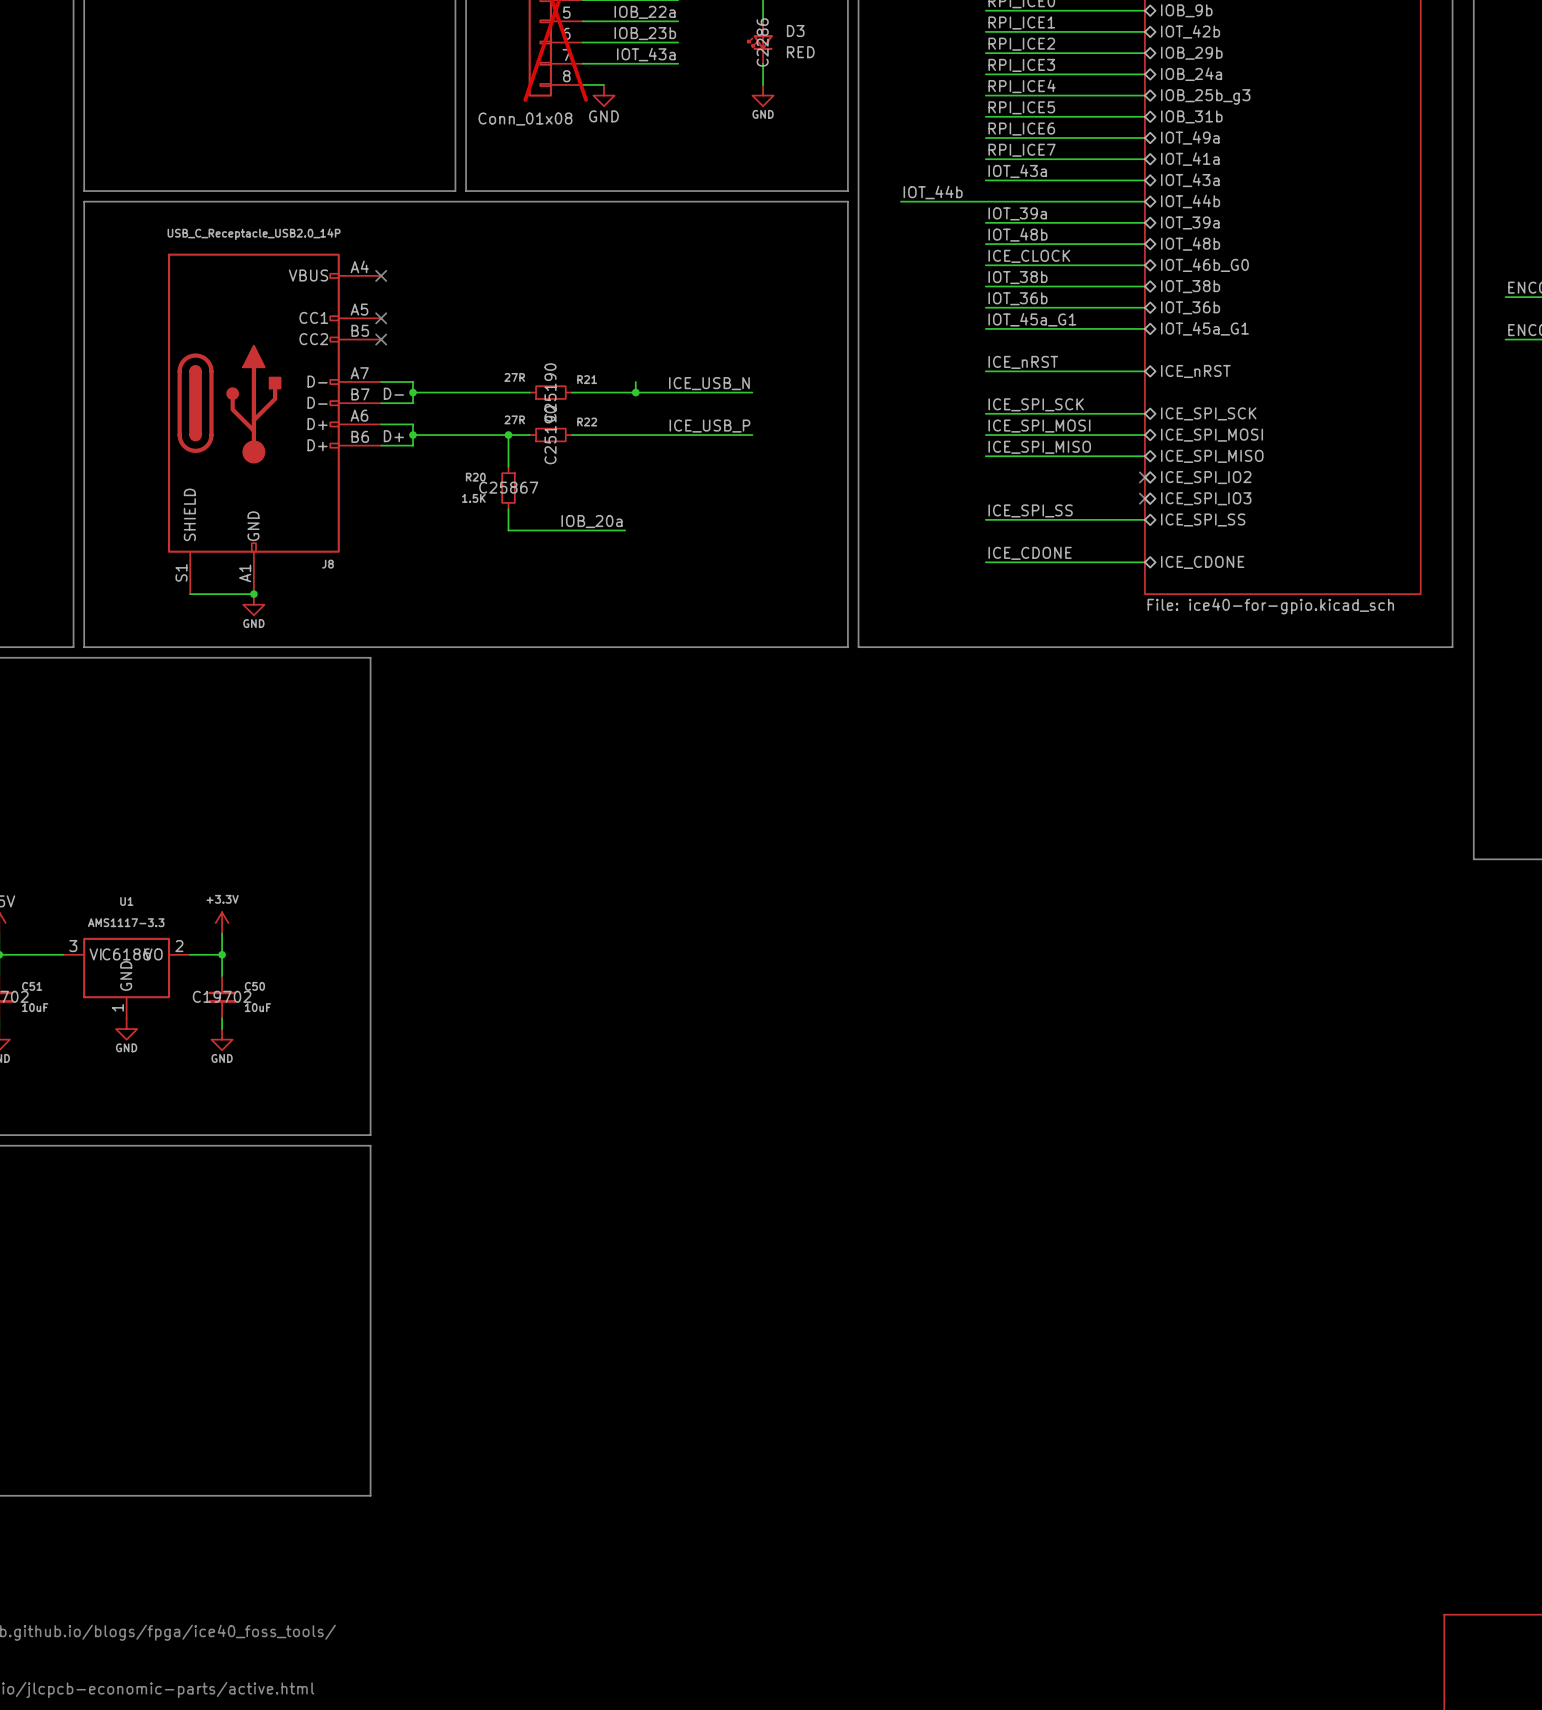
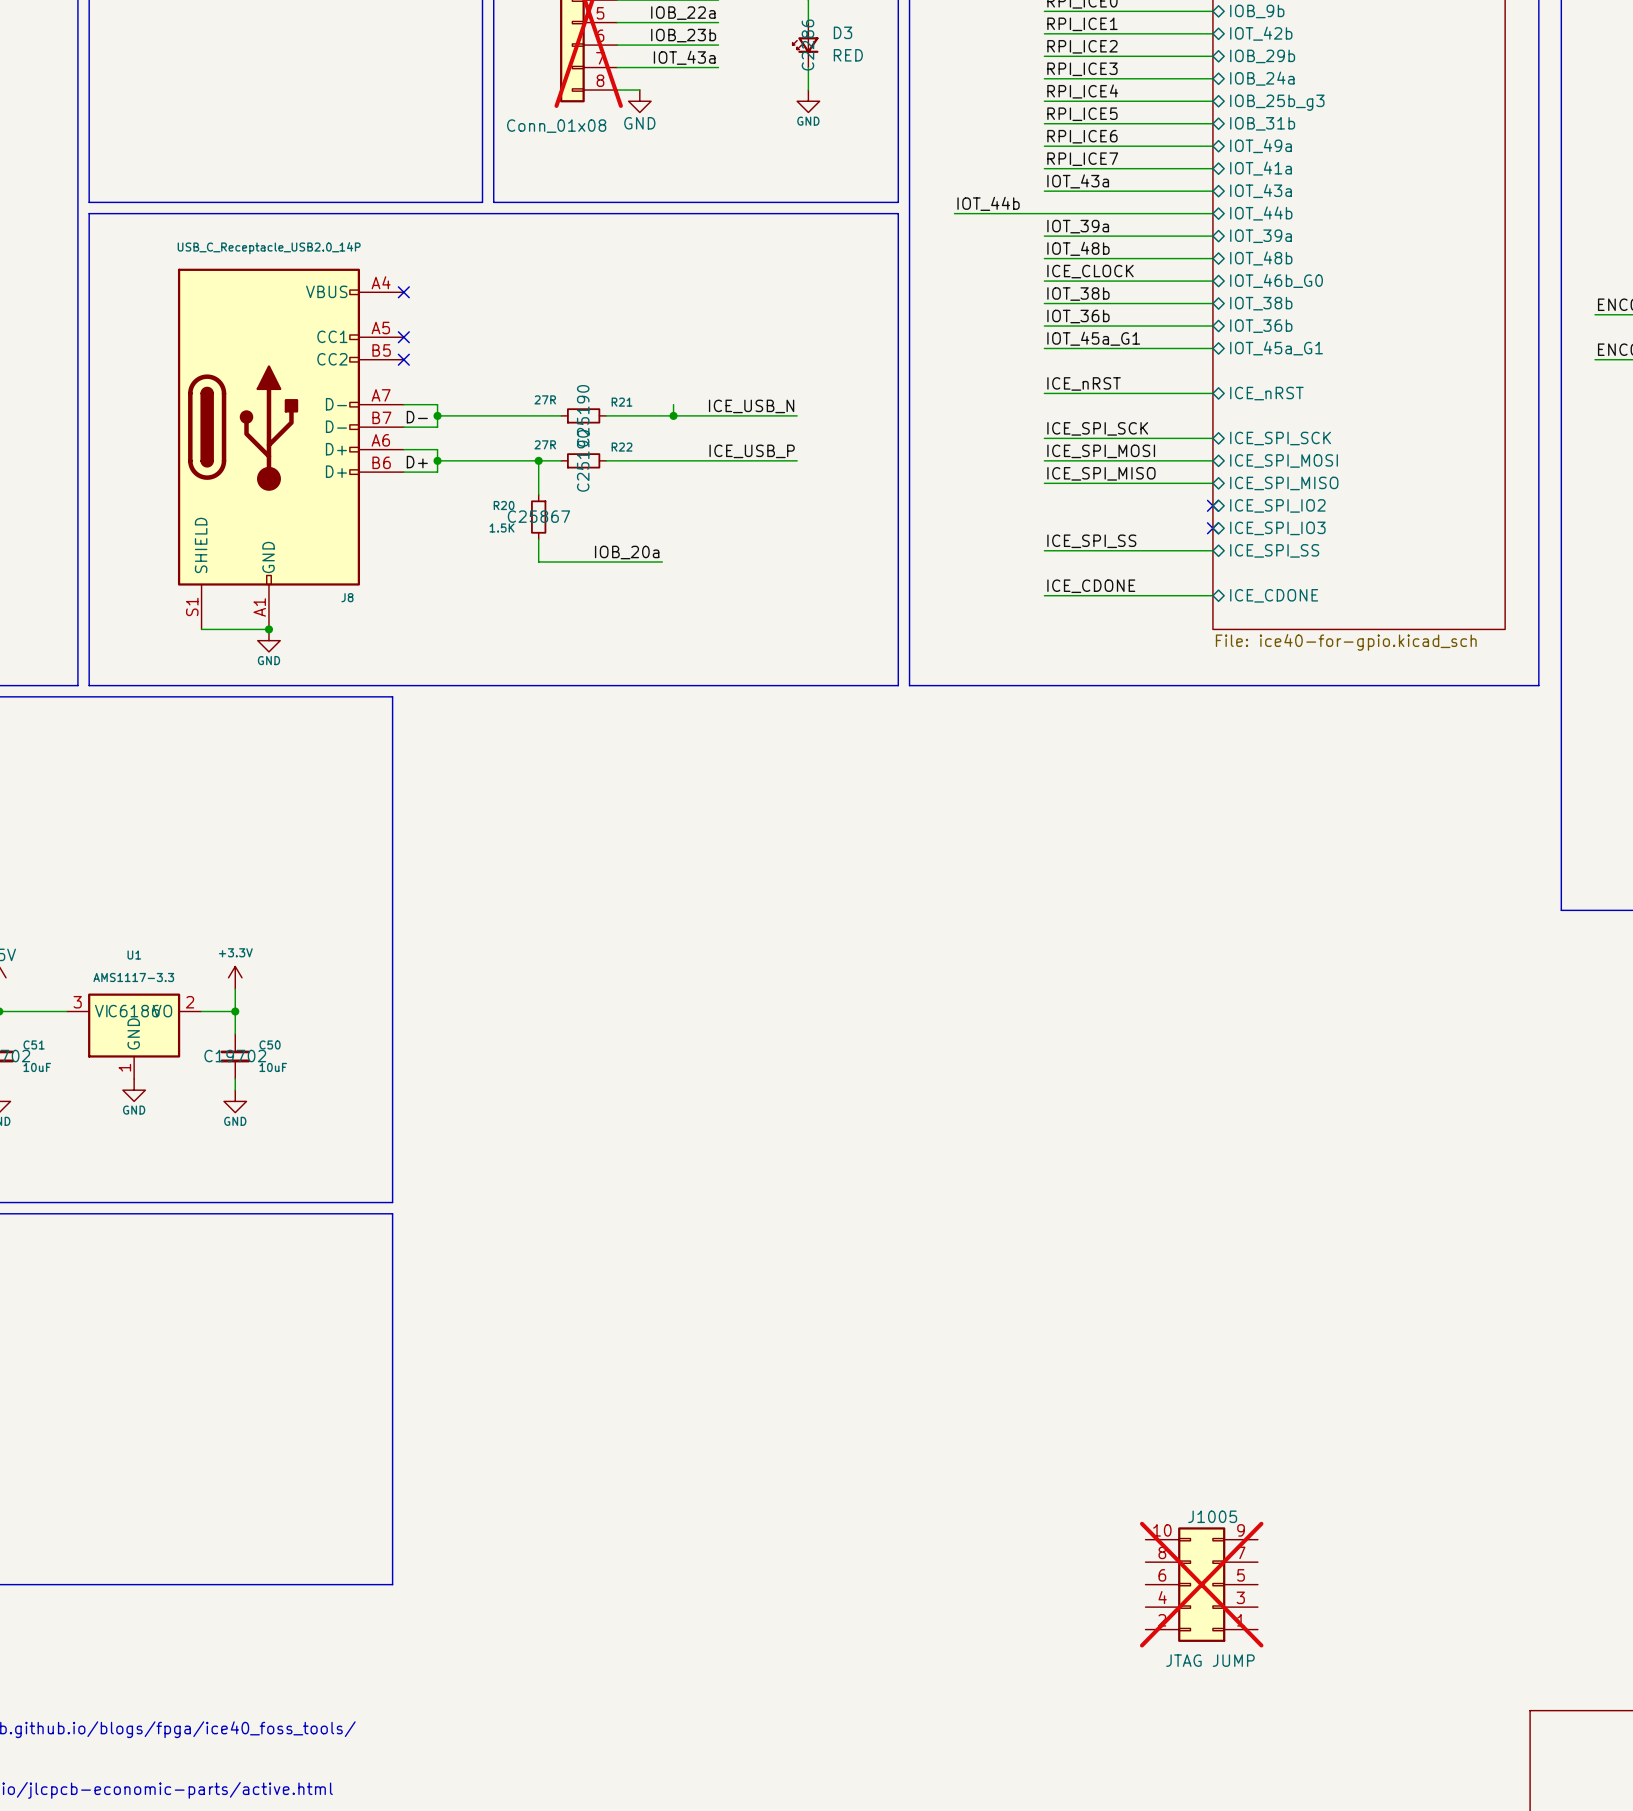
J1005: none -> JTAG JUMP (1201, 1584)

